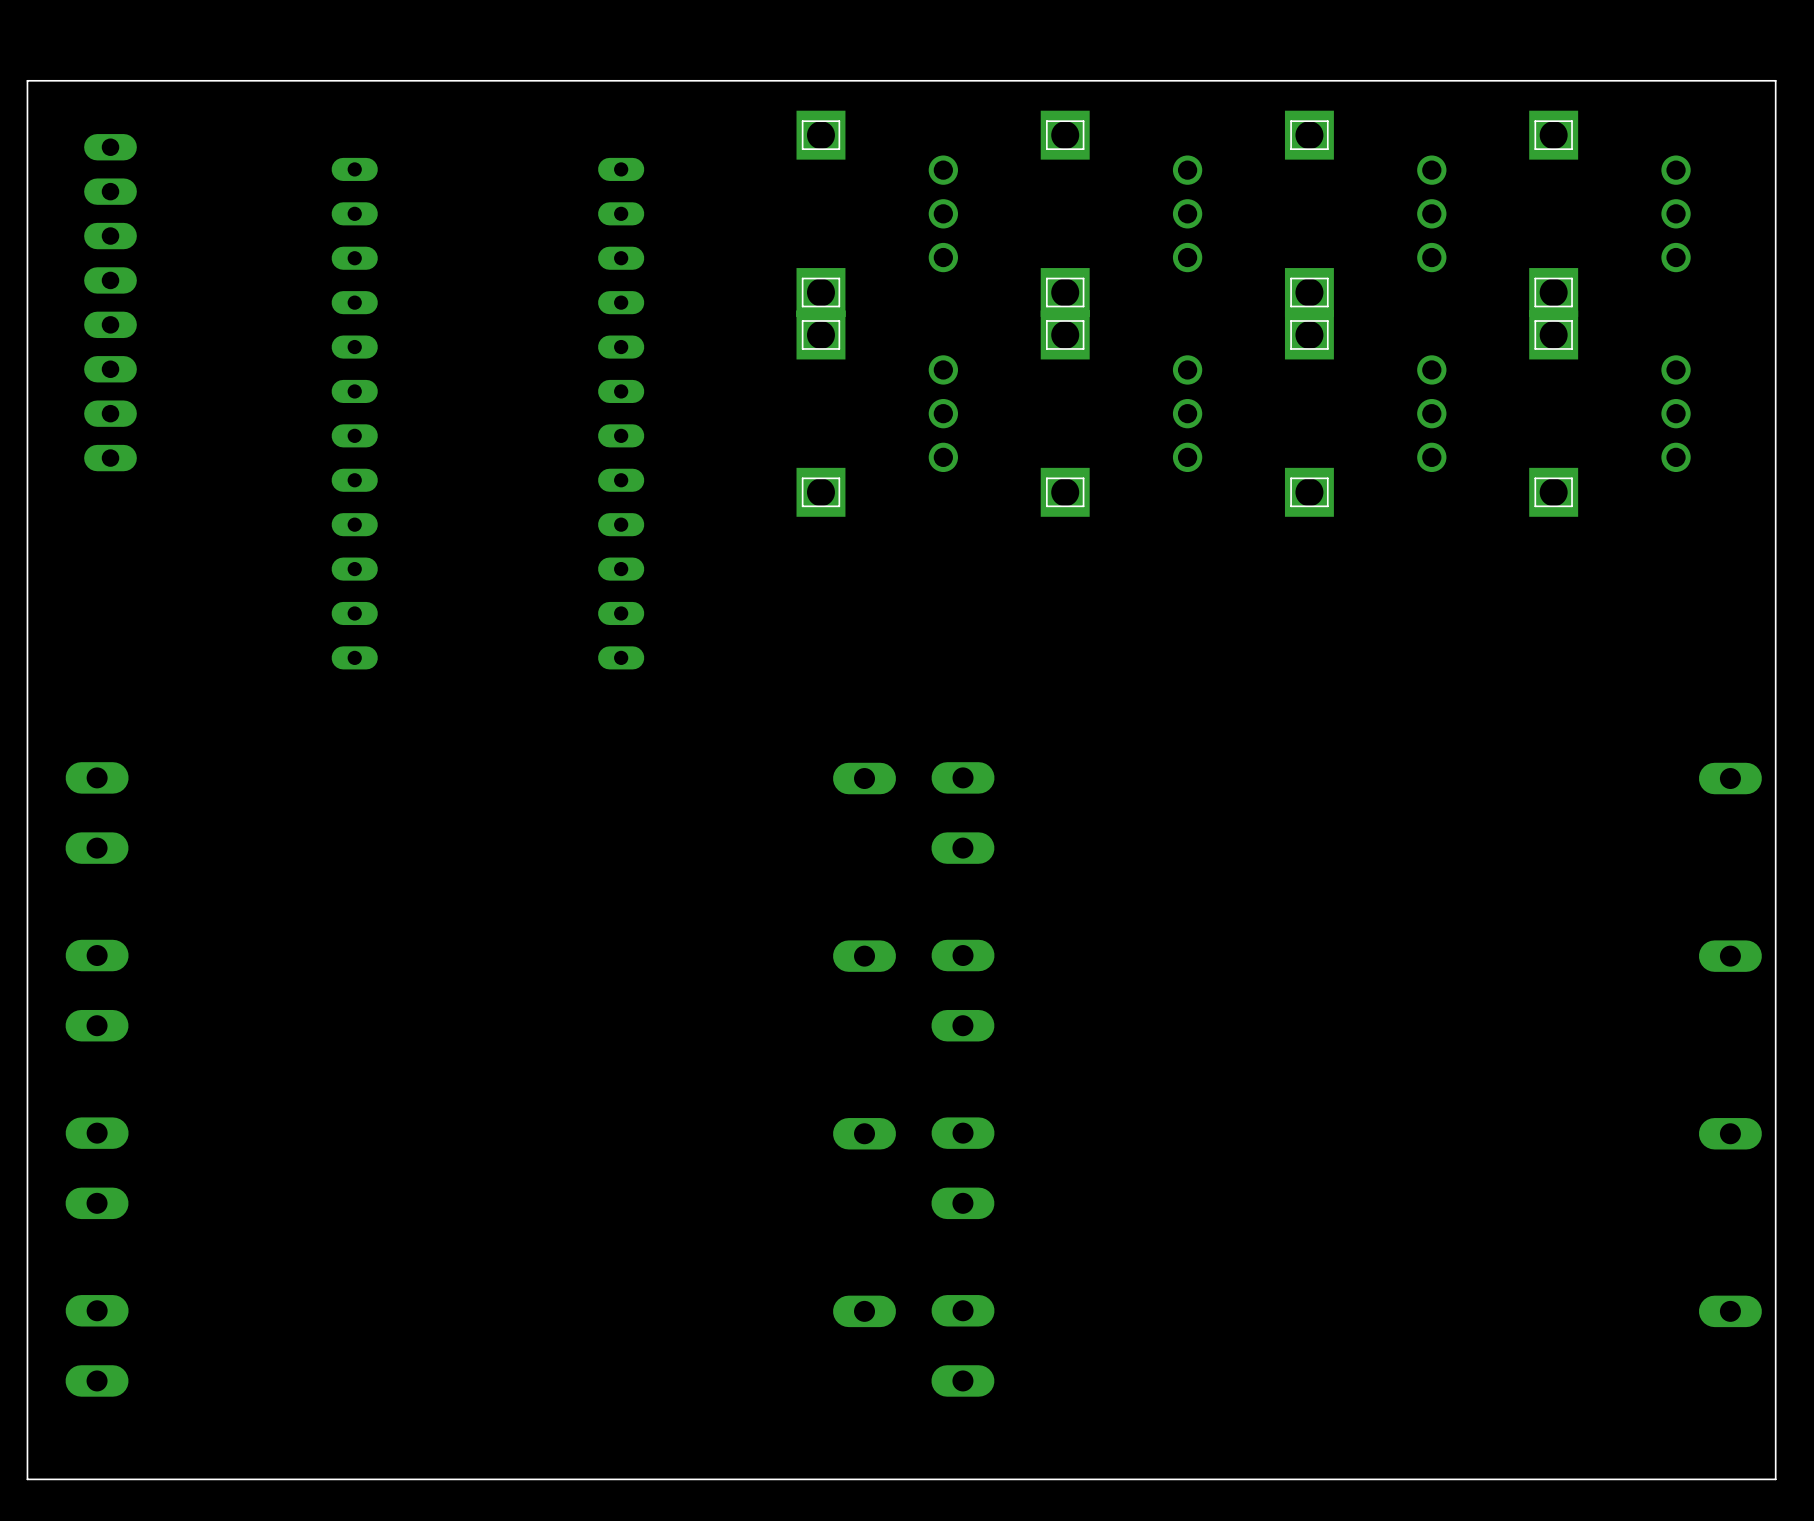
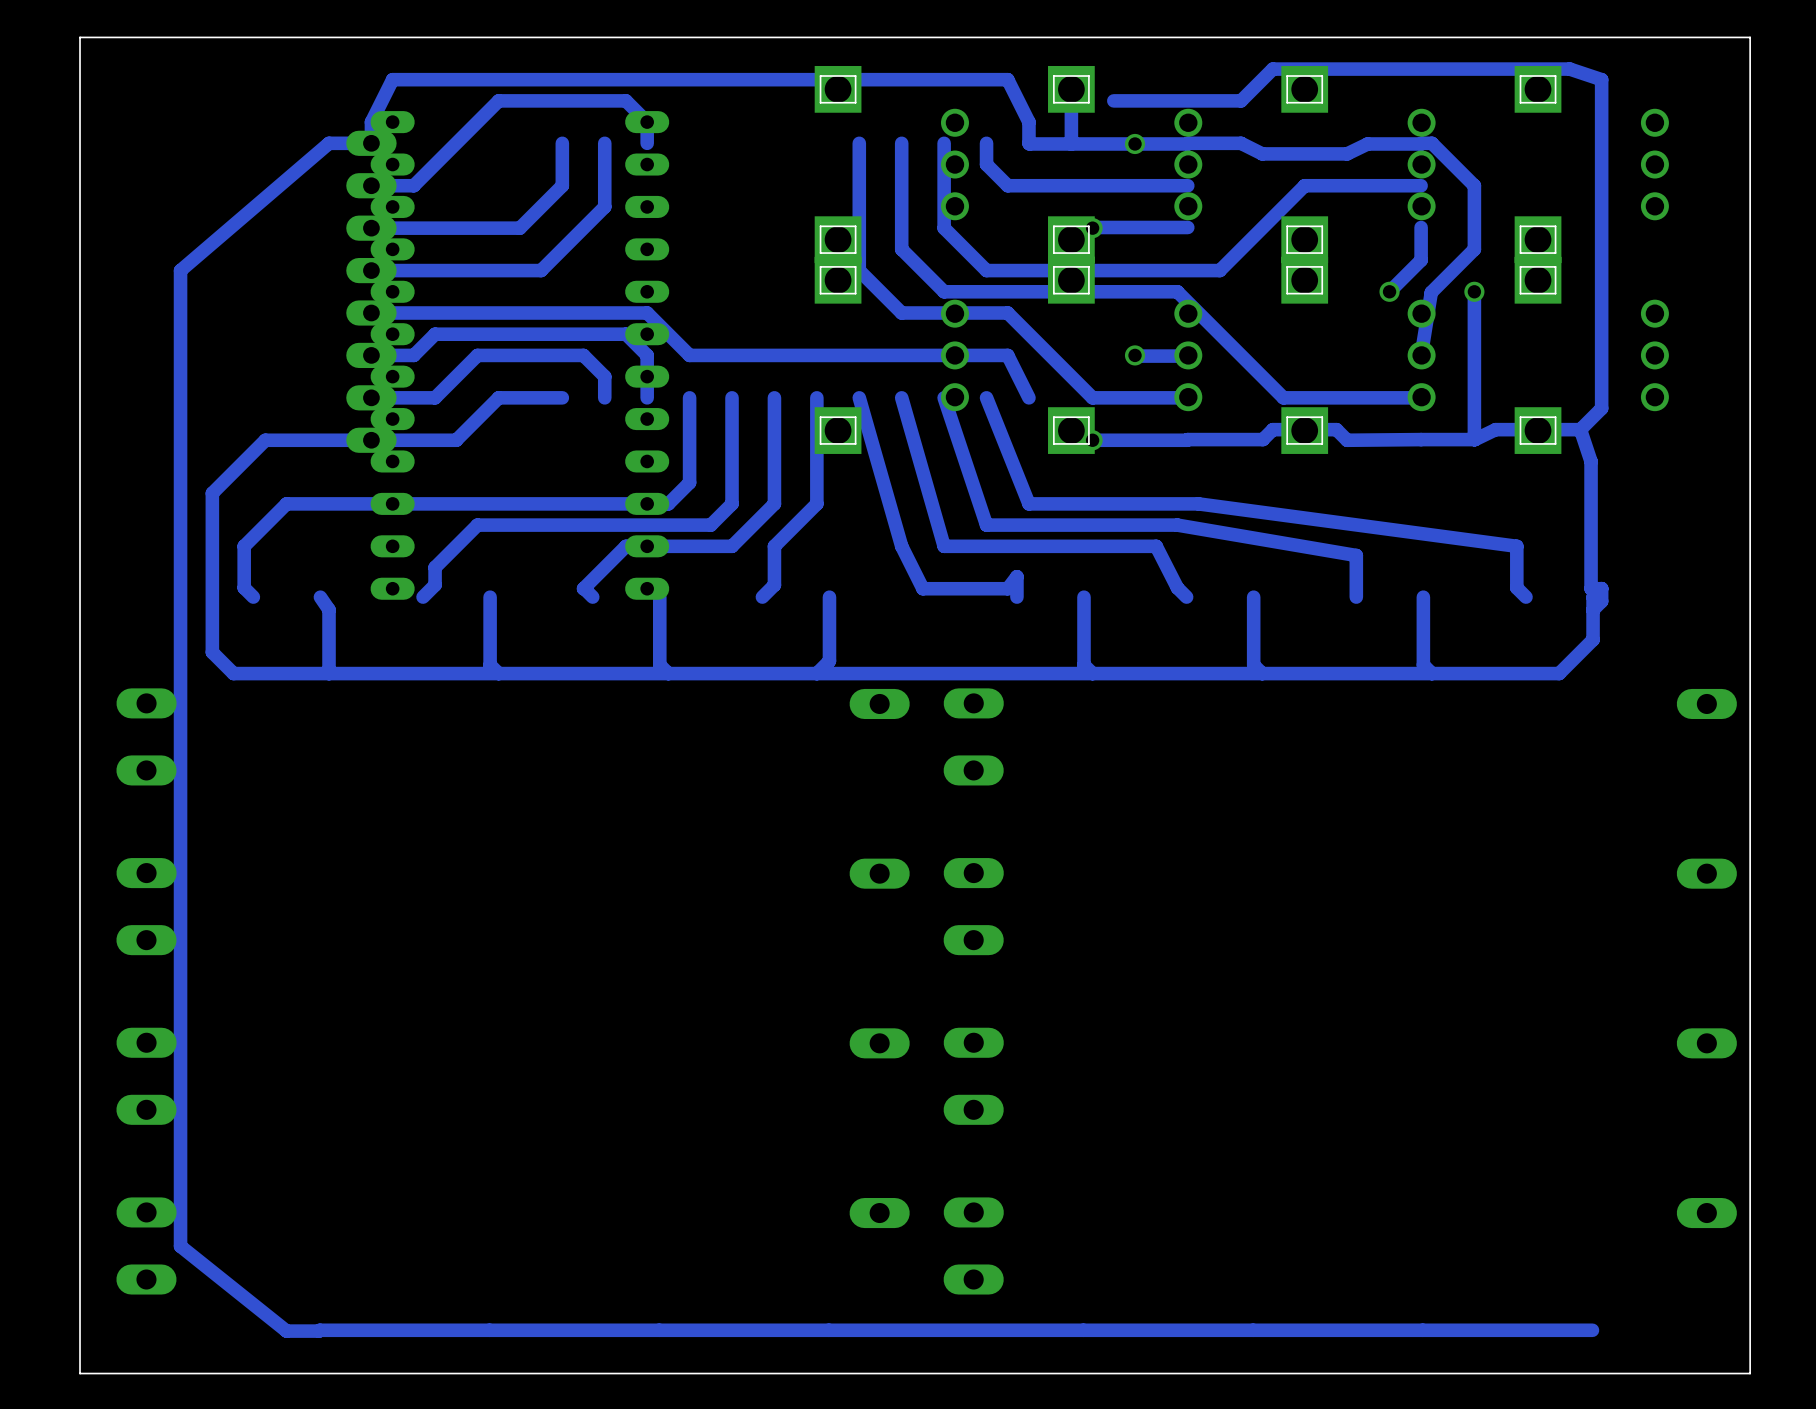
track: none -> (1071, 100) (1071, 143)
track: none -> (1113, 100) (1241, 100) (1272, 69) (1569, 69) (1601, 79) (1601, 408) (1580, 429)
track: none -> (562, 143) (562, 185) (519, 228) (371, 228)
track: none -> (604, 143) (604, 206) (541, 270) (371, 270)
track: none -> (647, 143) (647, 122) (625, 100) (498, 100) (413, 185) (371, 185)
track: none -> (859, 143) (859, 270) (901, 313) (1007, 313) (1092, 397) (1187, 397)
track: none -> (901, 143) (901, 249) (944, 291) (1177, 291) (1283, 397) (1421, 397)
track: none -> (944, 143) (944, 228) (986, 270) (1219, 270) (1304, 185) (1421, 185)
track: none -> (986, 143) (986, 164) (1007, 185) (1187, 185)
via: none -> (1135, 143)
track: none -> (1187, 227) (1092, 228)
track: none -> (1421, 227) (1421, 260) (1389, 291)
via: none -> (1092, 228)
part position: (110, 302) -> (371, 291)
via: none -> (1389, 291)
track: none -> (1474, 291) (1474, 439)
via: none -> (1474, 291)
track: none -> (371, 313) (647, 313) (689, 355) (1007, 355) (1028, 397)
track: none -> (371, 355) (413, 355) (435, 334) (625, 334) (647, 355) (647, 397)
track: none -> (1135, 355) (1187, 356)
via: none -> (1135, 355)
track: none -> (1421, 356) (1431, 292) (1474, 249) (1474, 185) (1431, 143) (1367, 143) (1347, 153) (1262, 153) (1241, 143) (1029, 143) (1028, 122) (1007, 79) (392, 79) (371, 122) (371, 143) (329, 143) (180, 270) (180, 1246) (286, 1331) (1592, 1330)
track: none -> (562, 397) (498, 397) (456, 440) (265, 440) (212, 493) (212, 652) (233, 673) (1559, 673) (1593, 639) (1593, 597) (1601, 588)
track: none -> (604, 397) (604, 376) (583, 355) (477, 355) (435, 397) (371, 397)
track: none -> (689, 397) (689, 482) (668, 503) (286, 503) (244, 546) (244, 587) (253, 597)
track: none -> (732, 397) (732, 503) (710, 525) (477, 525) (435, 567) (435, 585) (423, 597)
track: none -> (774, 397) (774, 503) (732, 546) (625, 546) (583, 588) (592, 597)
track: none -> (816, 397) (816, 503) (774, 546) (774, 585) (762, 597)
track: none -> (859, 397) (901, 546) (922, 588) (1007, 588) (1016, 576) (1016, 597)
track: none -> (901, 397) (944, 546) (1156, 546) (1177, 587) (1186, 597)
track: none -> (944, 397) (986, 525) (1177, 525) (1356, 555) (1356, 597)
track: none -> (986, 397) (1028, 503) (1198, 503) (1516, 546) (1516, 587) (1526, 597)
track: none -> (1580, 429) (1495, 429) (1475, 439) (1347, 440) (1336, 429) (1272, 429) (1262, 439) (1092, 440)
track: none -> (1580, 429) (1591, 461) (1591, 588) (1601, 588) (1601, 601) (1593, 609)
via: none -> (1092, 440)
track: none -> (320, 597) (329, 609) (329, 673)
track: none -> (490, 597) (490, 664) (498, 673)
track: none -> (659, 597) (659, 664) (668, 673)
track: none -> (829, 597) (829, 660) (816, 673)
track: none -> (1084, 597) (1084, 664) (1092, 673)
track: none -> (1253, 597) (1253, 664) (1262, 673)
track: none -> (1423, 597) (1423, 664) (1431, 673)

